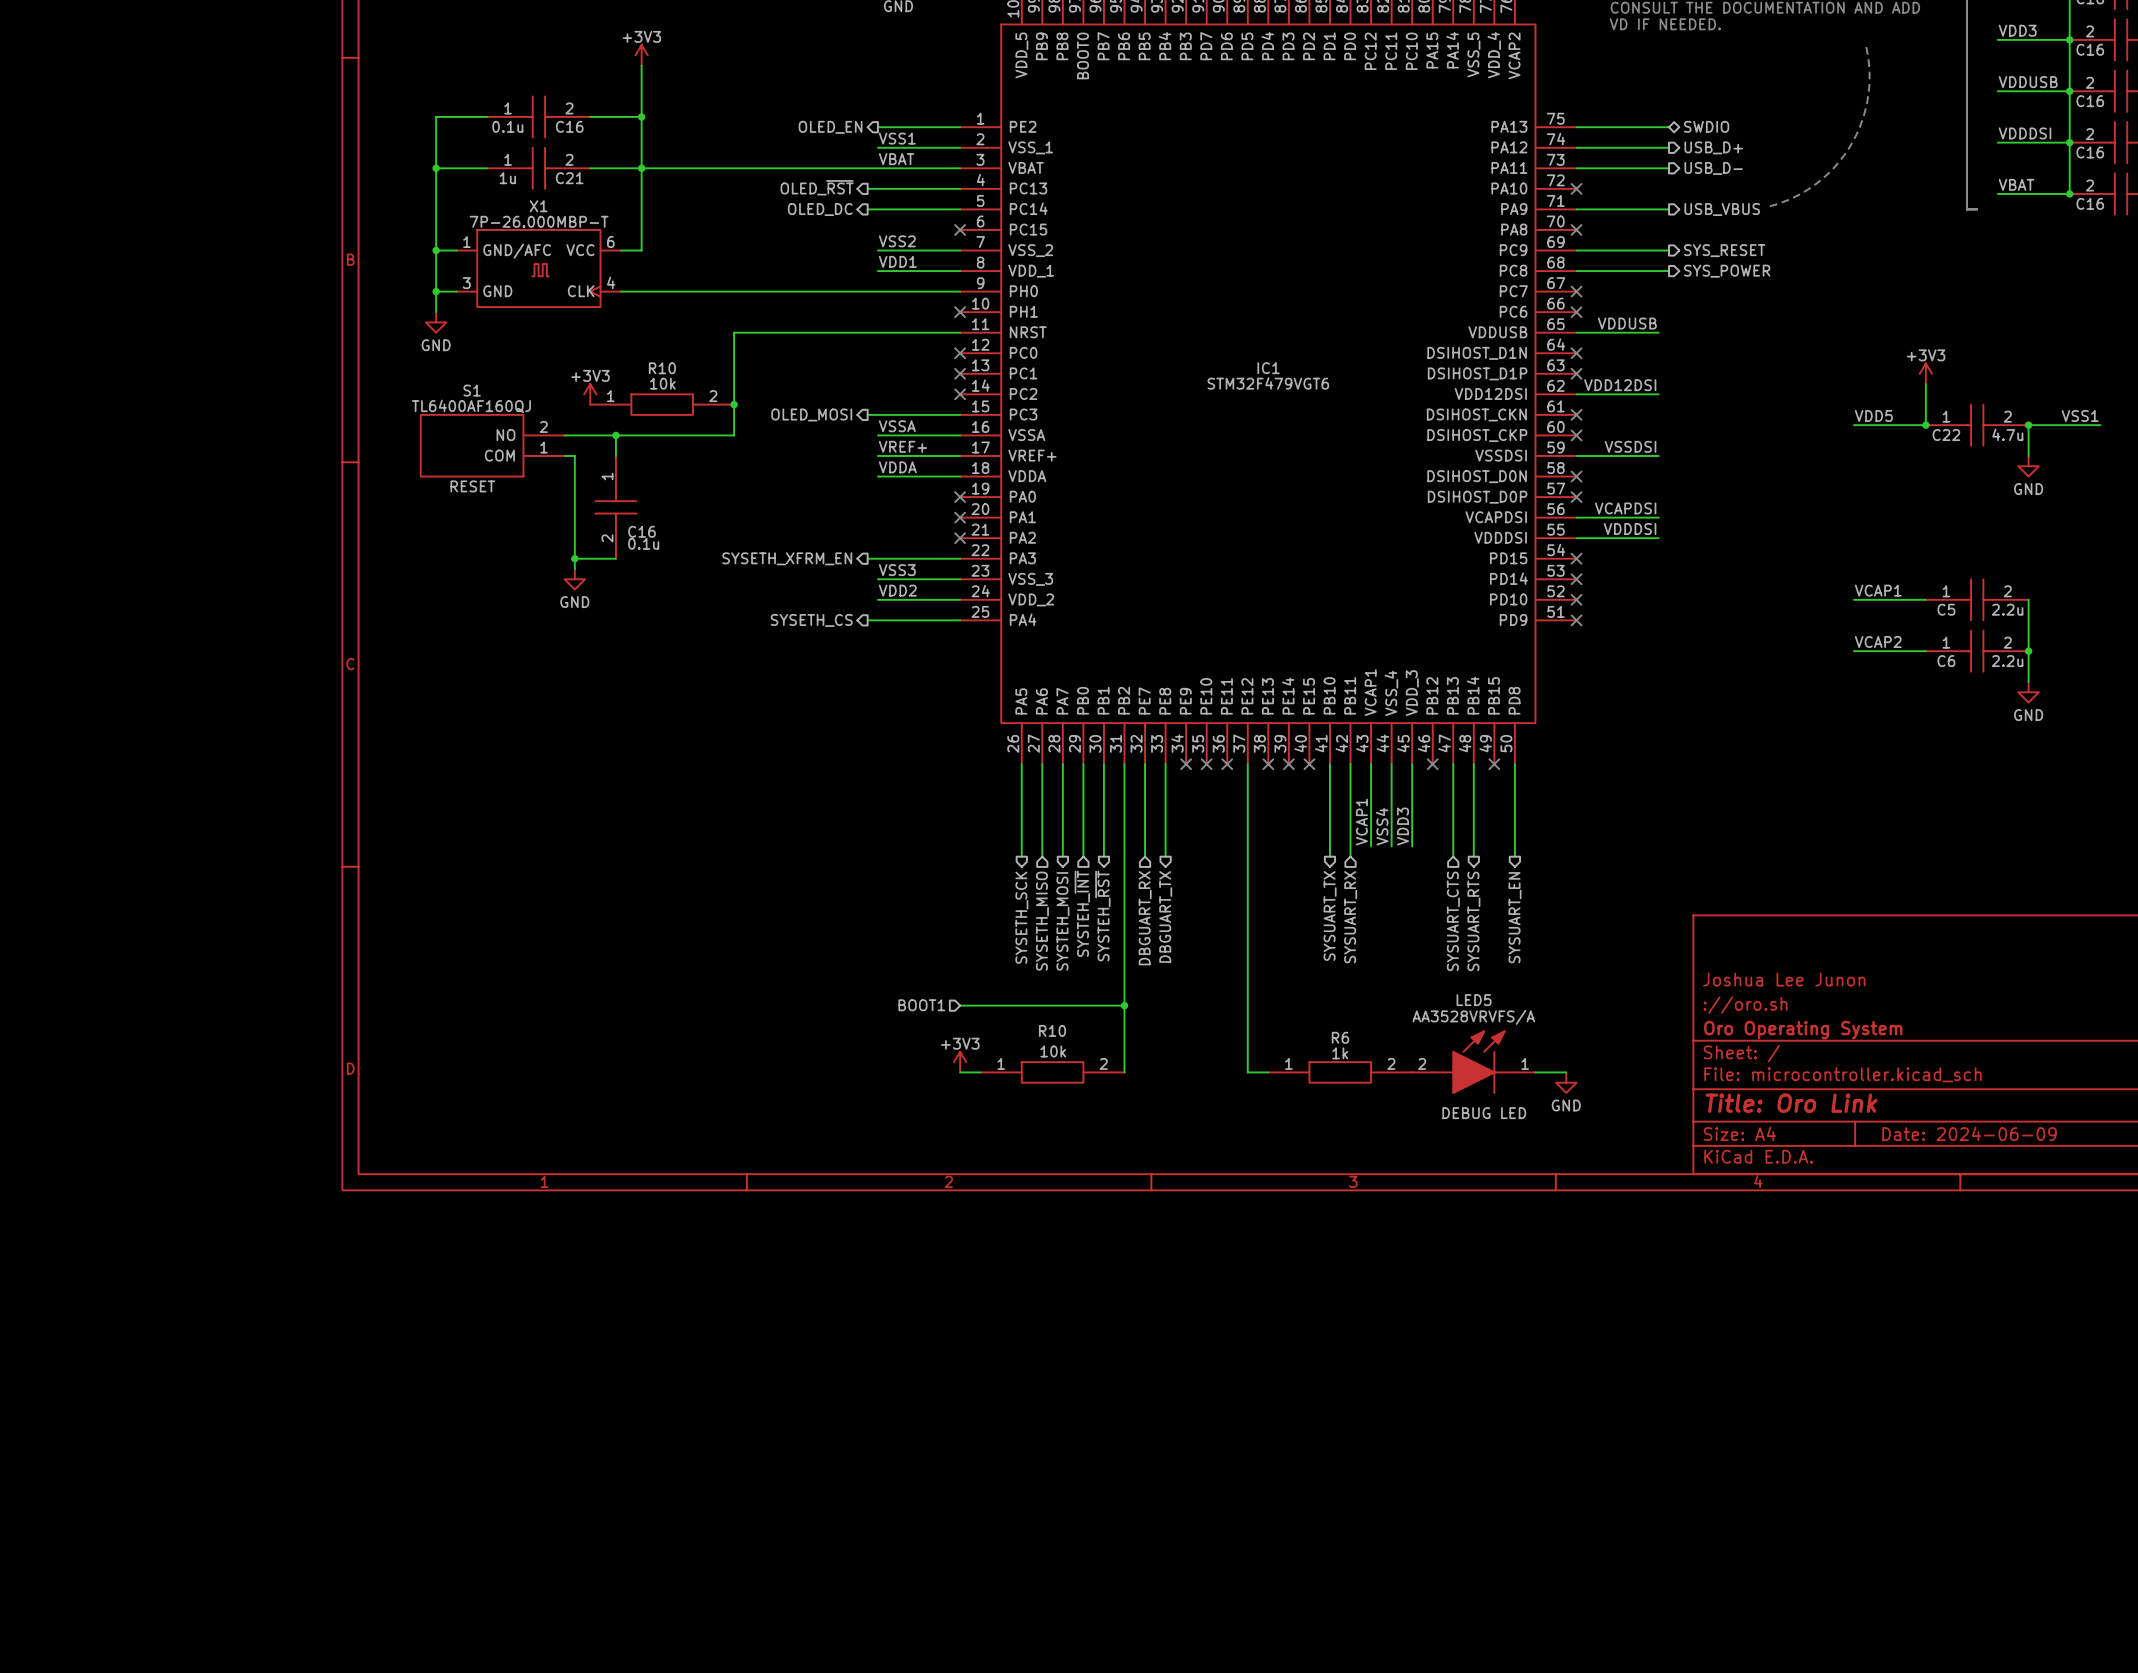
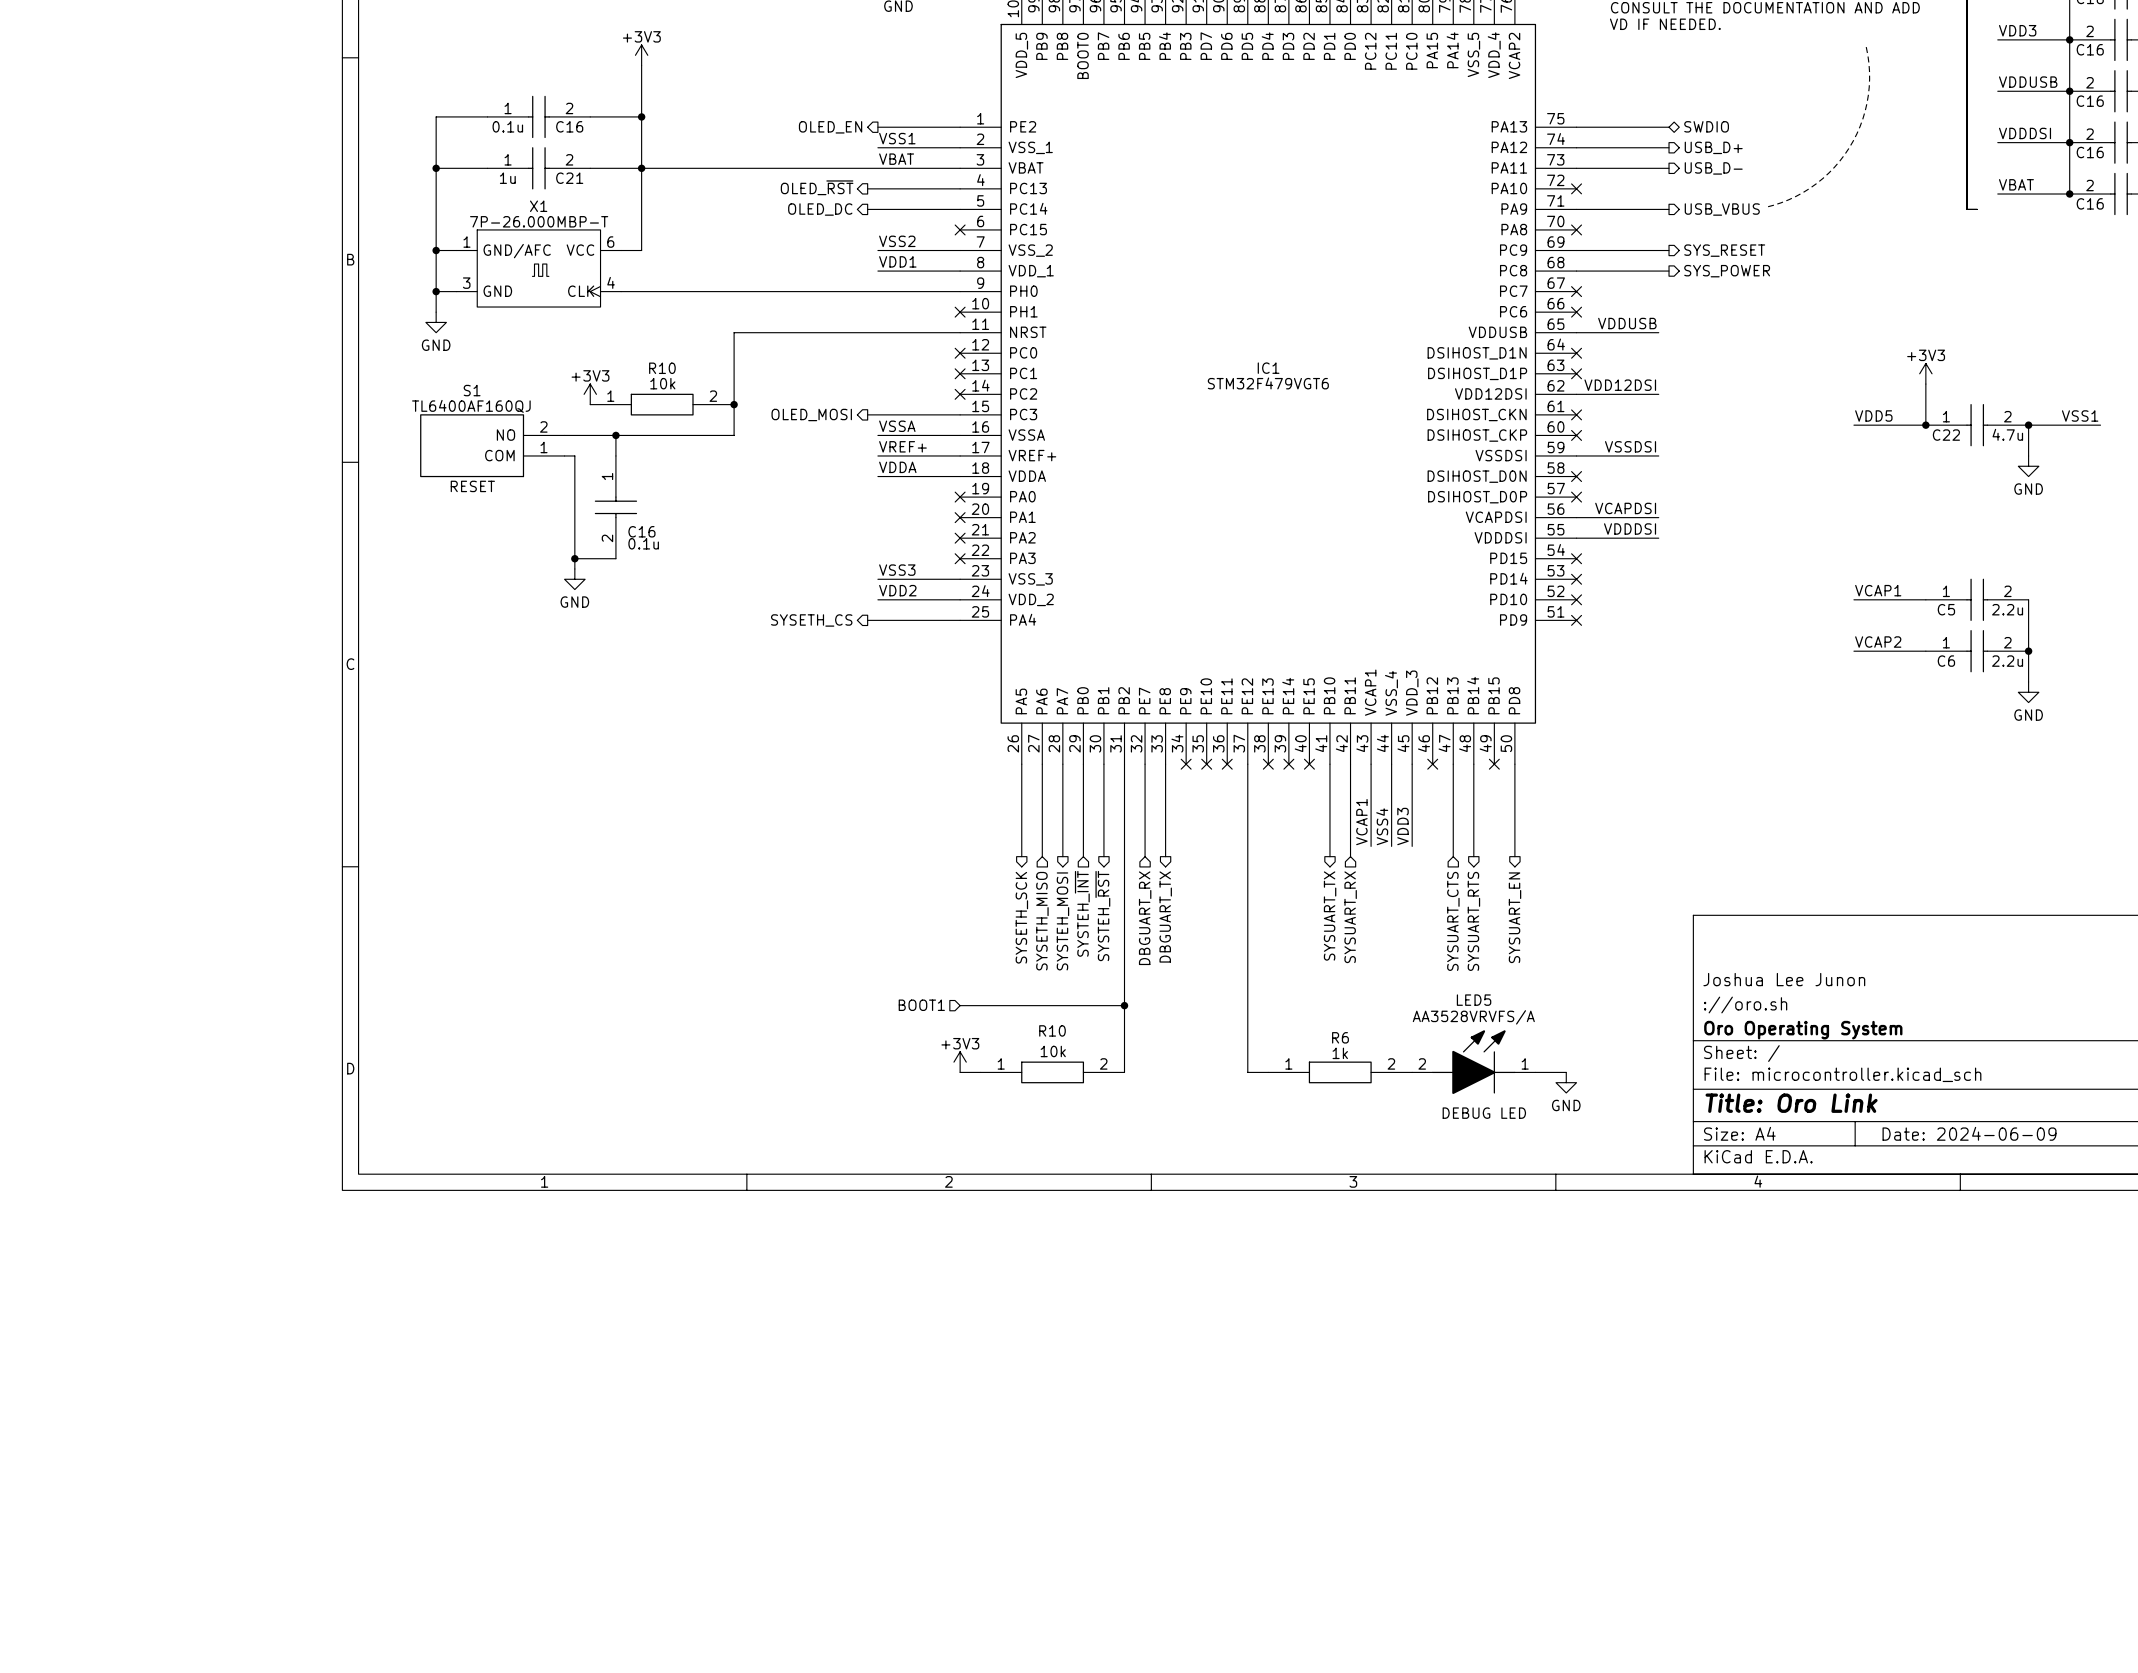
hierarchical label: SYSETH_XFRM_EN (787, 558) -> none
wire: (867, 558) (960, 558) -> none
no-connect mark: none -> (960, 558)

